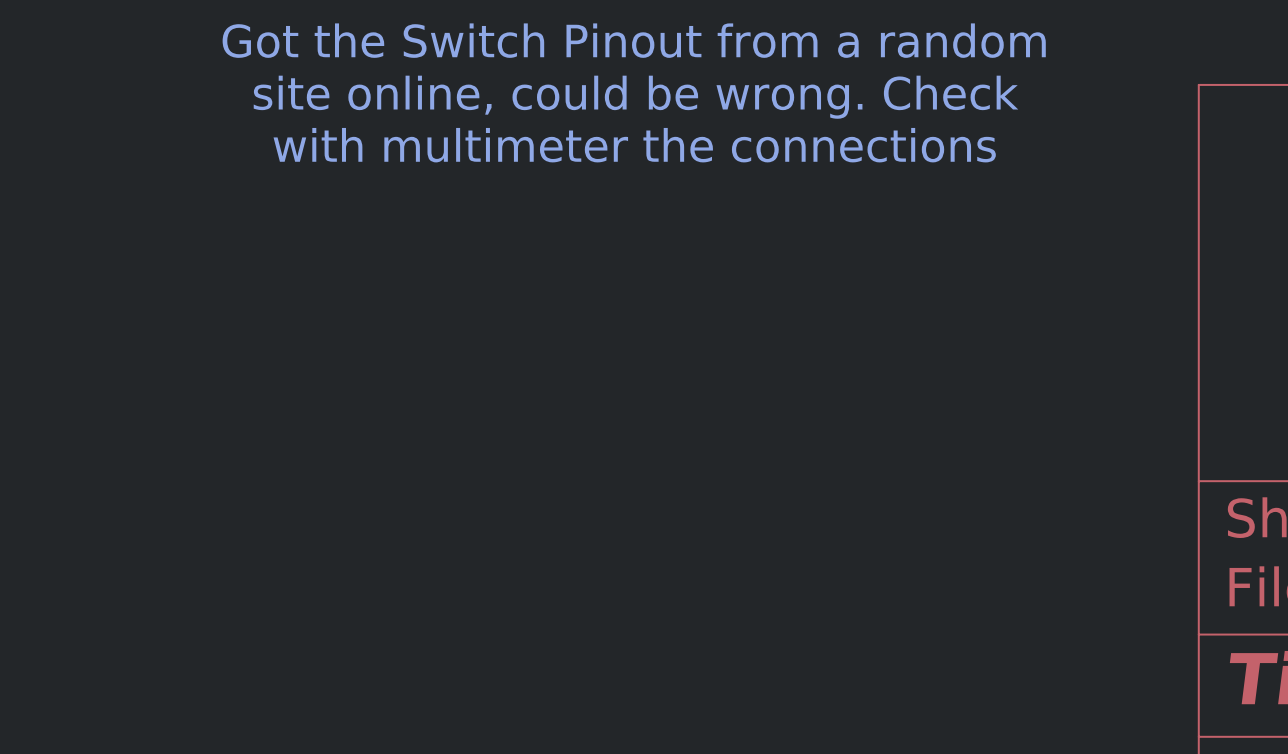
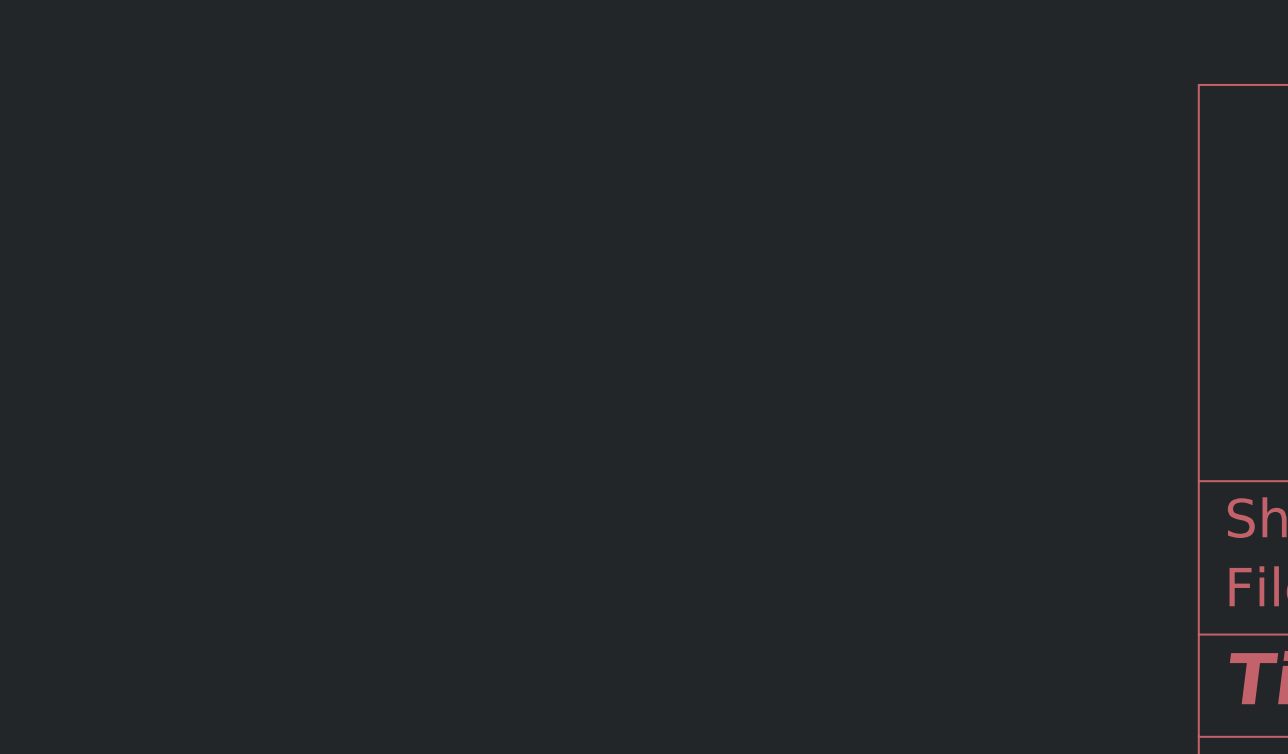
text: Got the Switch Pinout from a random (634, 40) -> none
text: site online, could be wrong. Check (635, 97) -> none
text: with multimeter the connections (634, 145) -> none

